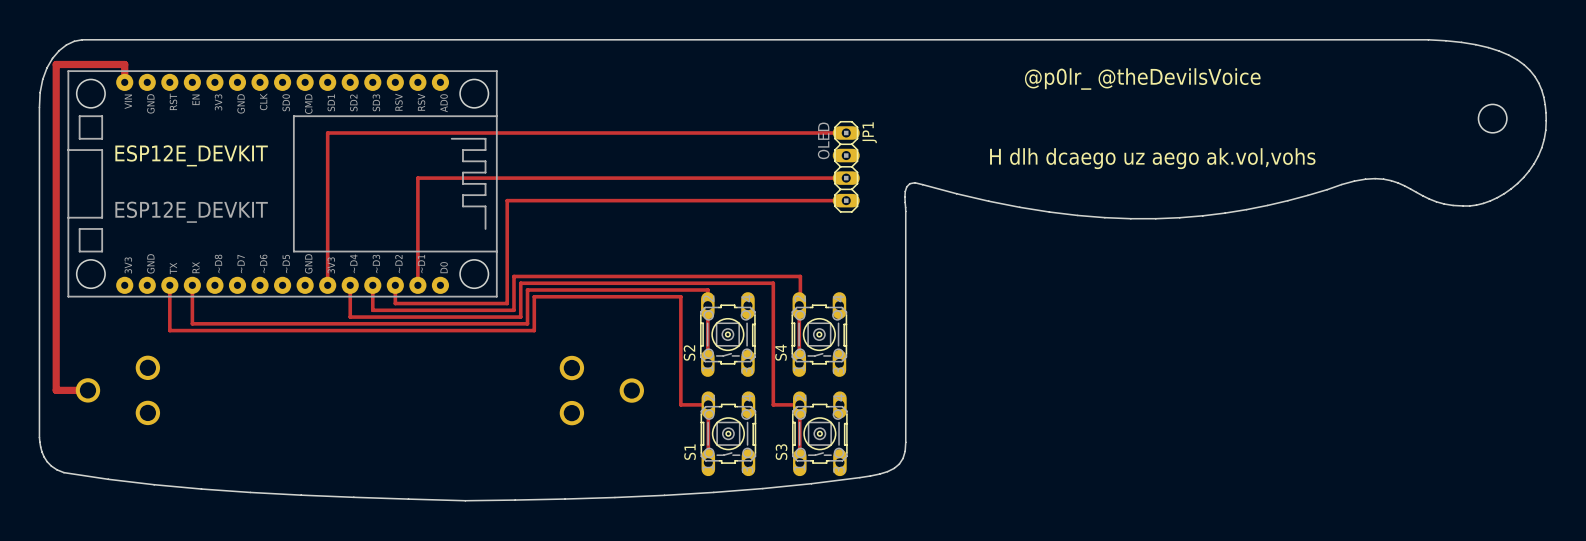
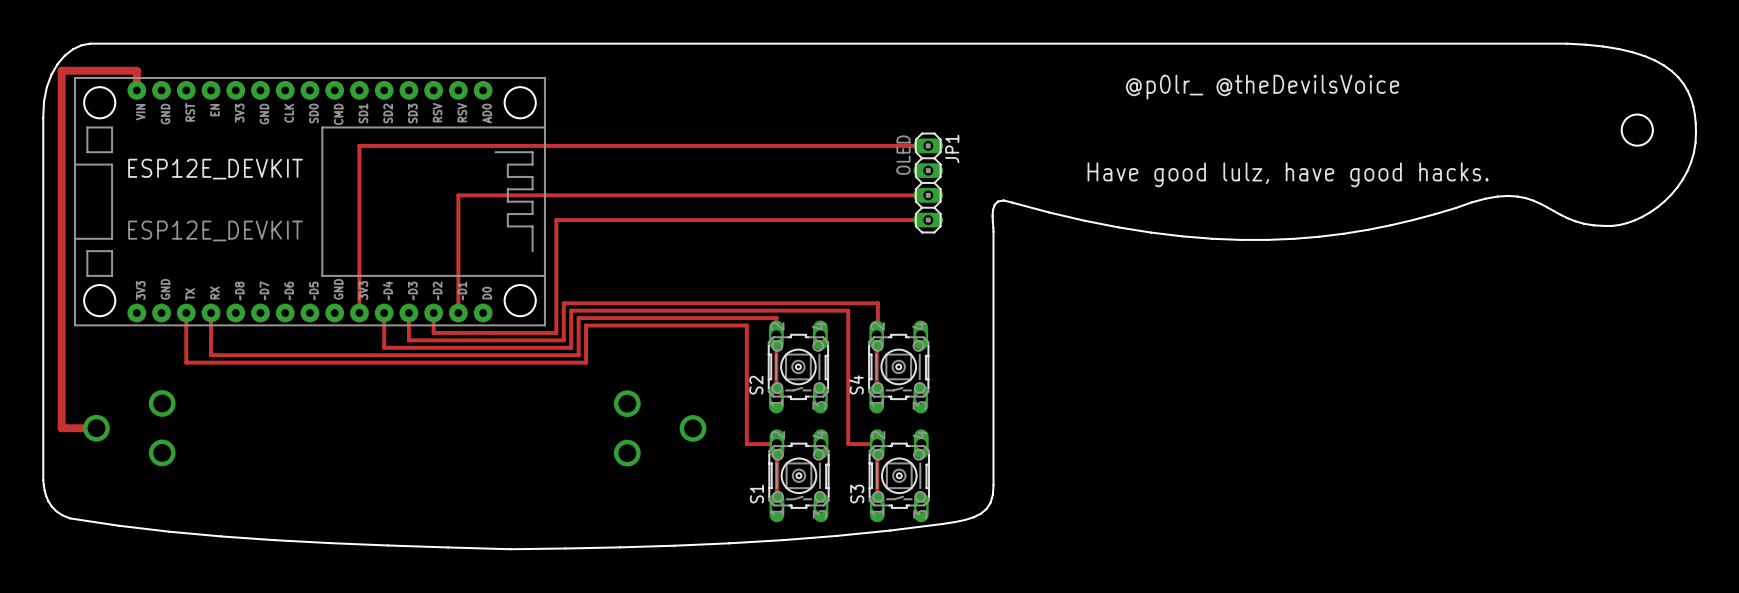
text: H dlh dcaego uz aego ak.vol,vohs (1152, 158) -> Have good lulz, have good hacks. (1288, 174)

